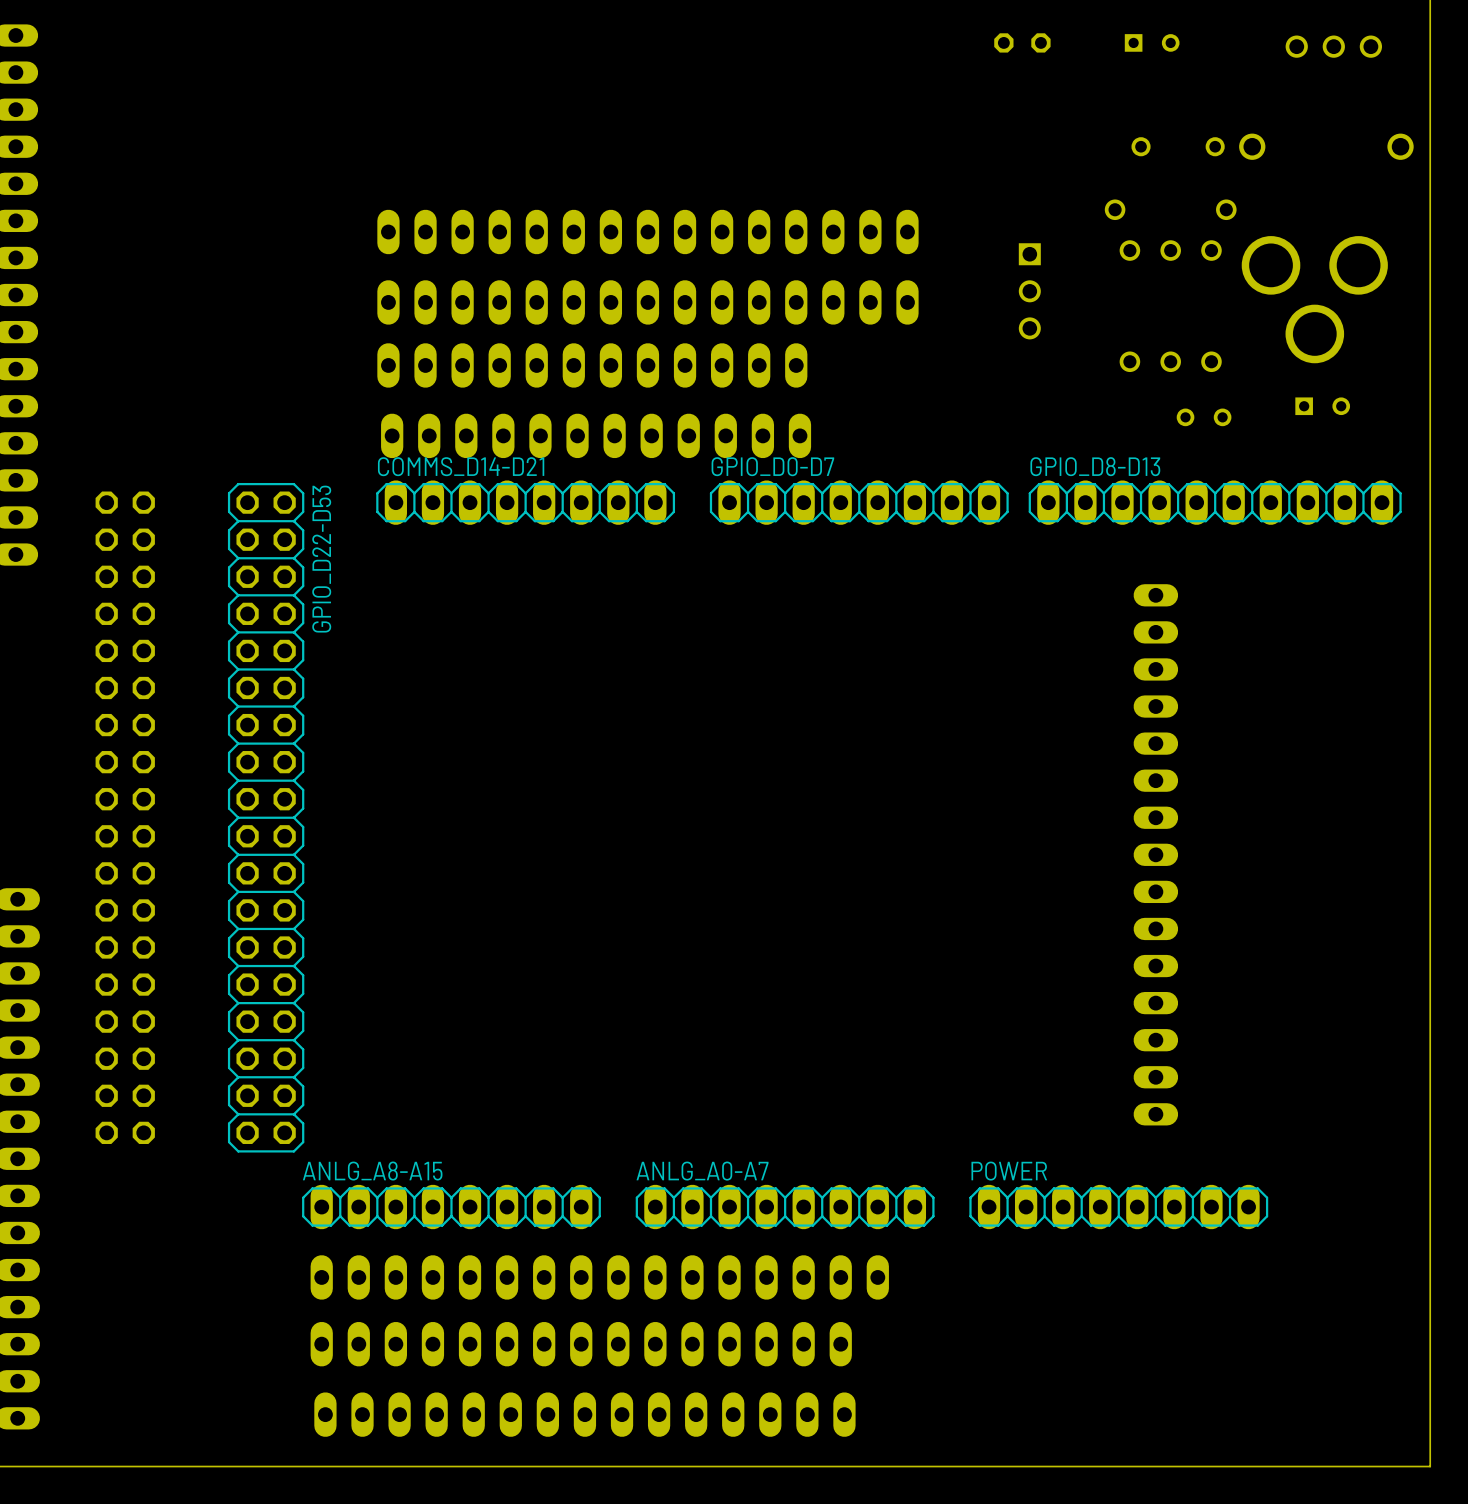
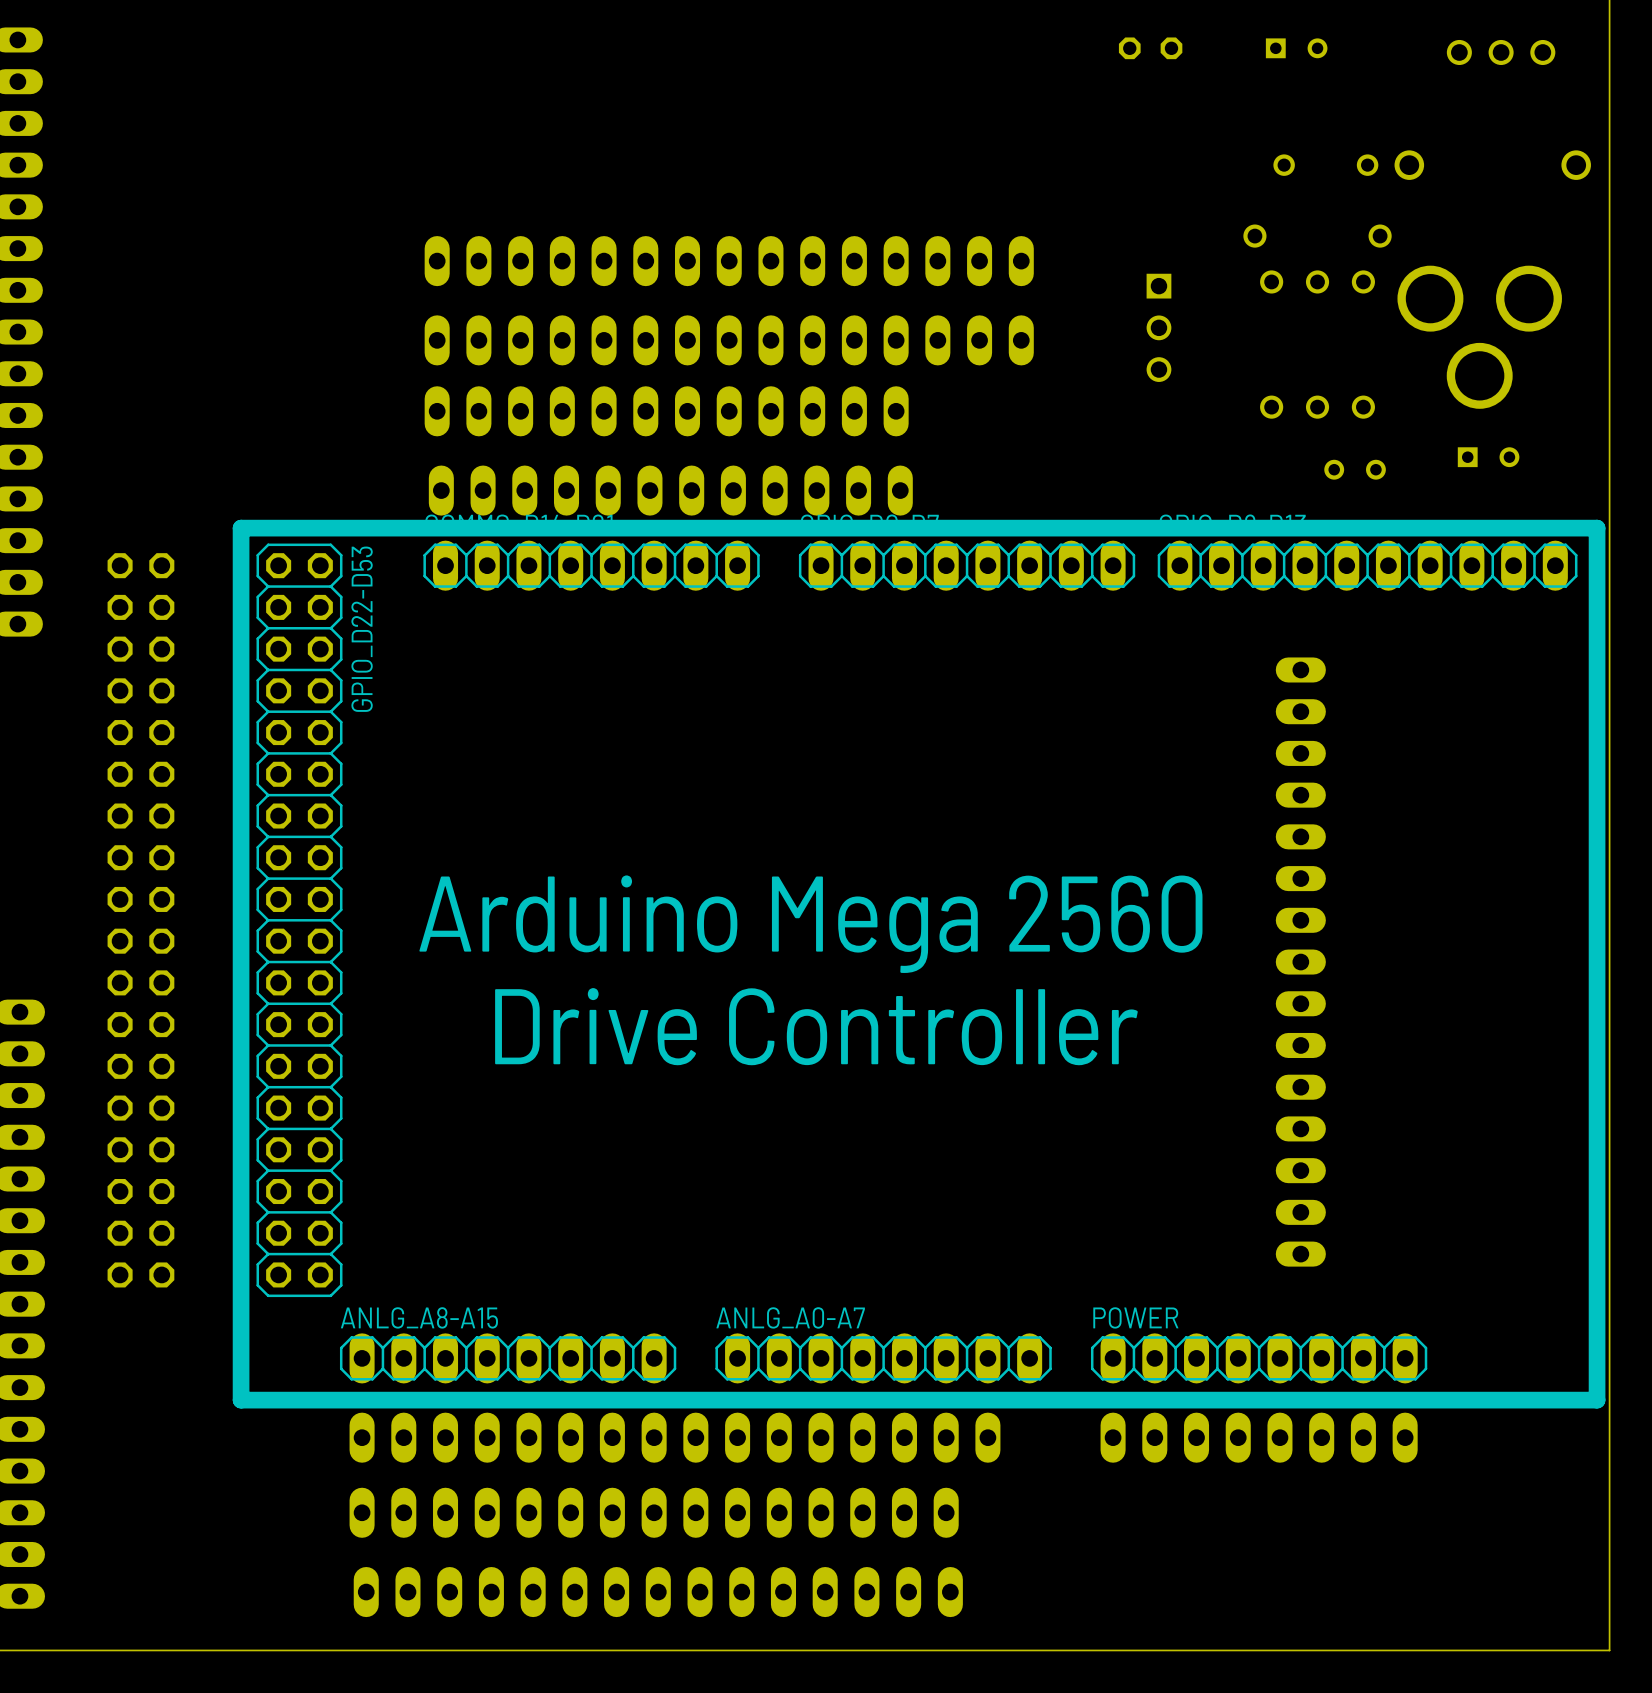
line: none -> (1597, 528) (241, 528) (241, 1400) (1597, 1400) (1597, 528)
text: none -> Arduino Mega 2560 (810, 924)
text: none -> Drive Controller (816, 1026)
part: none -> (1259, 1437)

